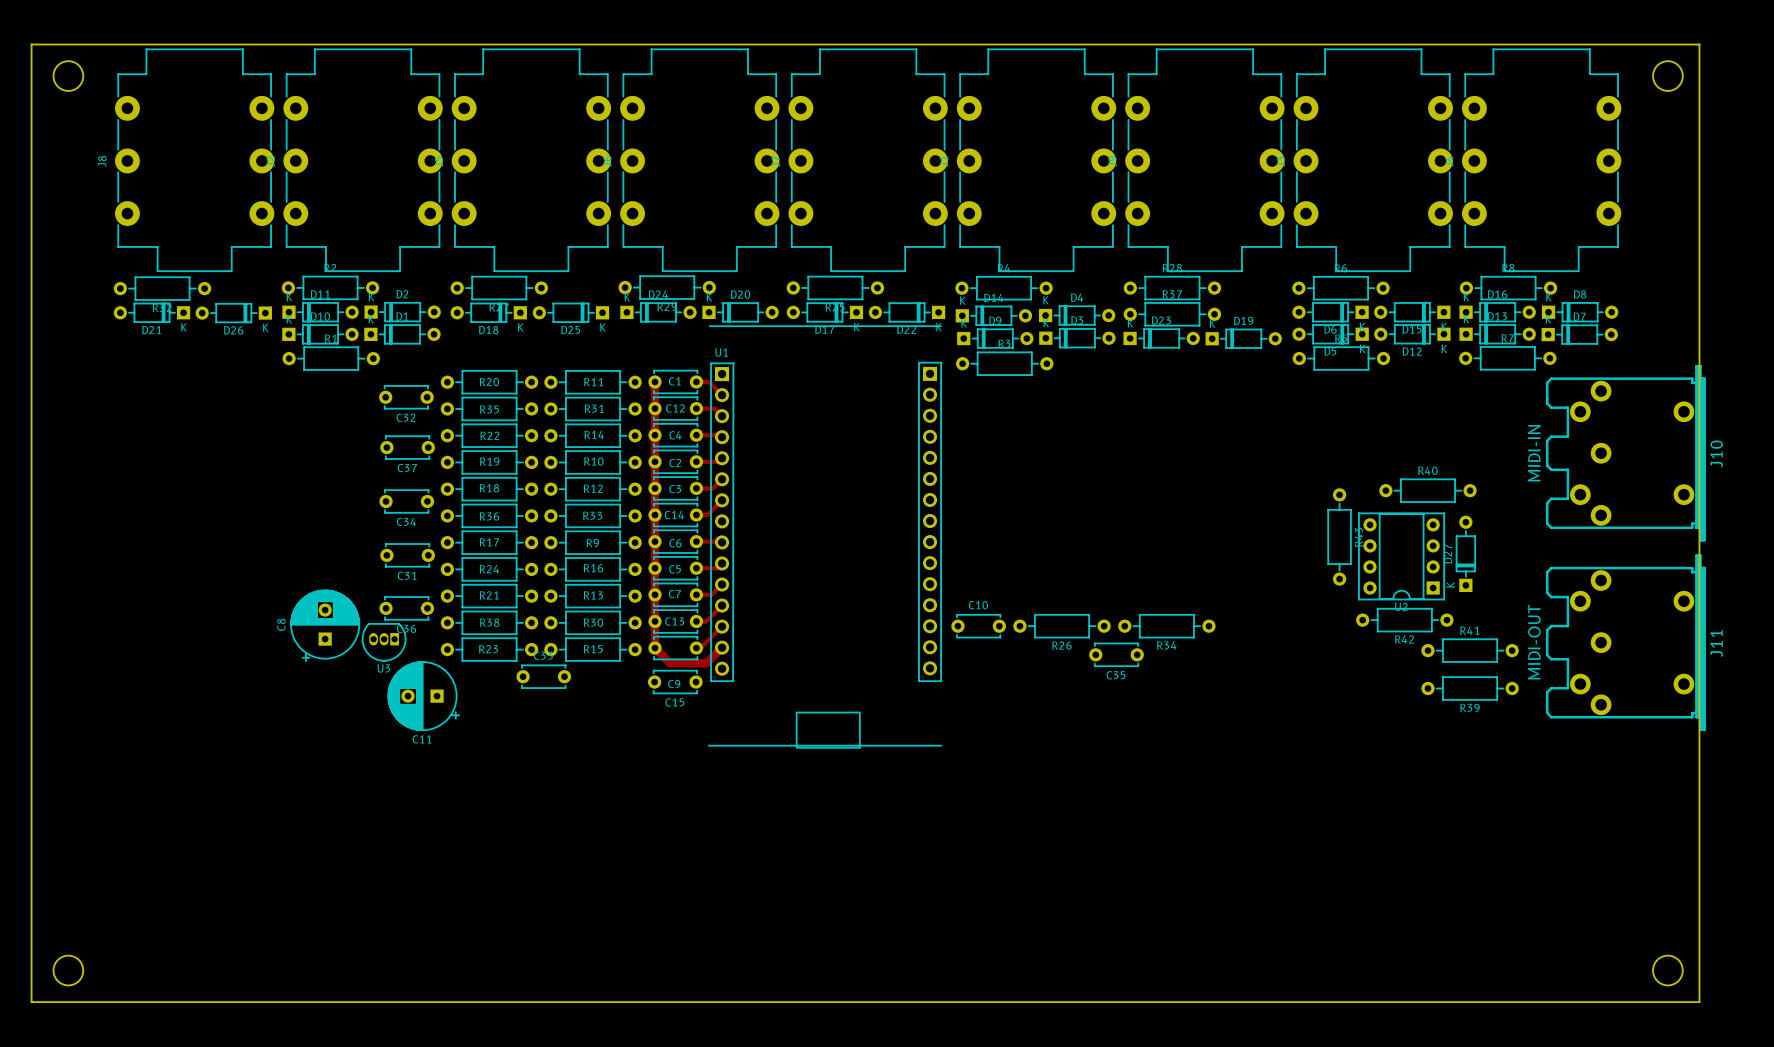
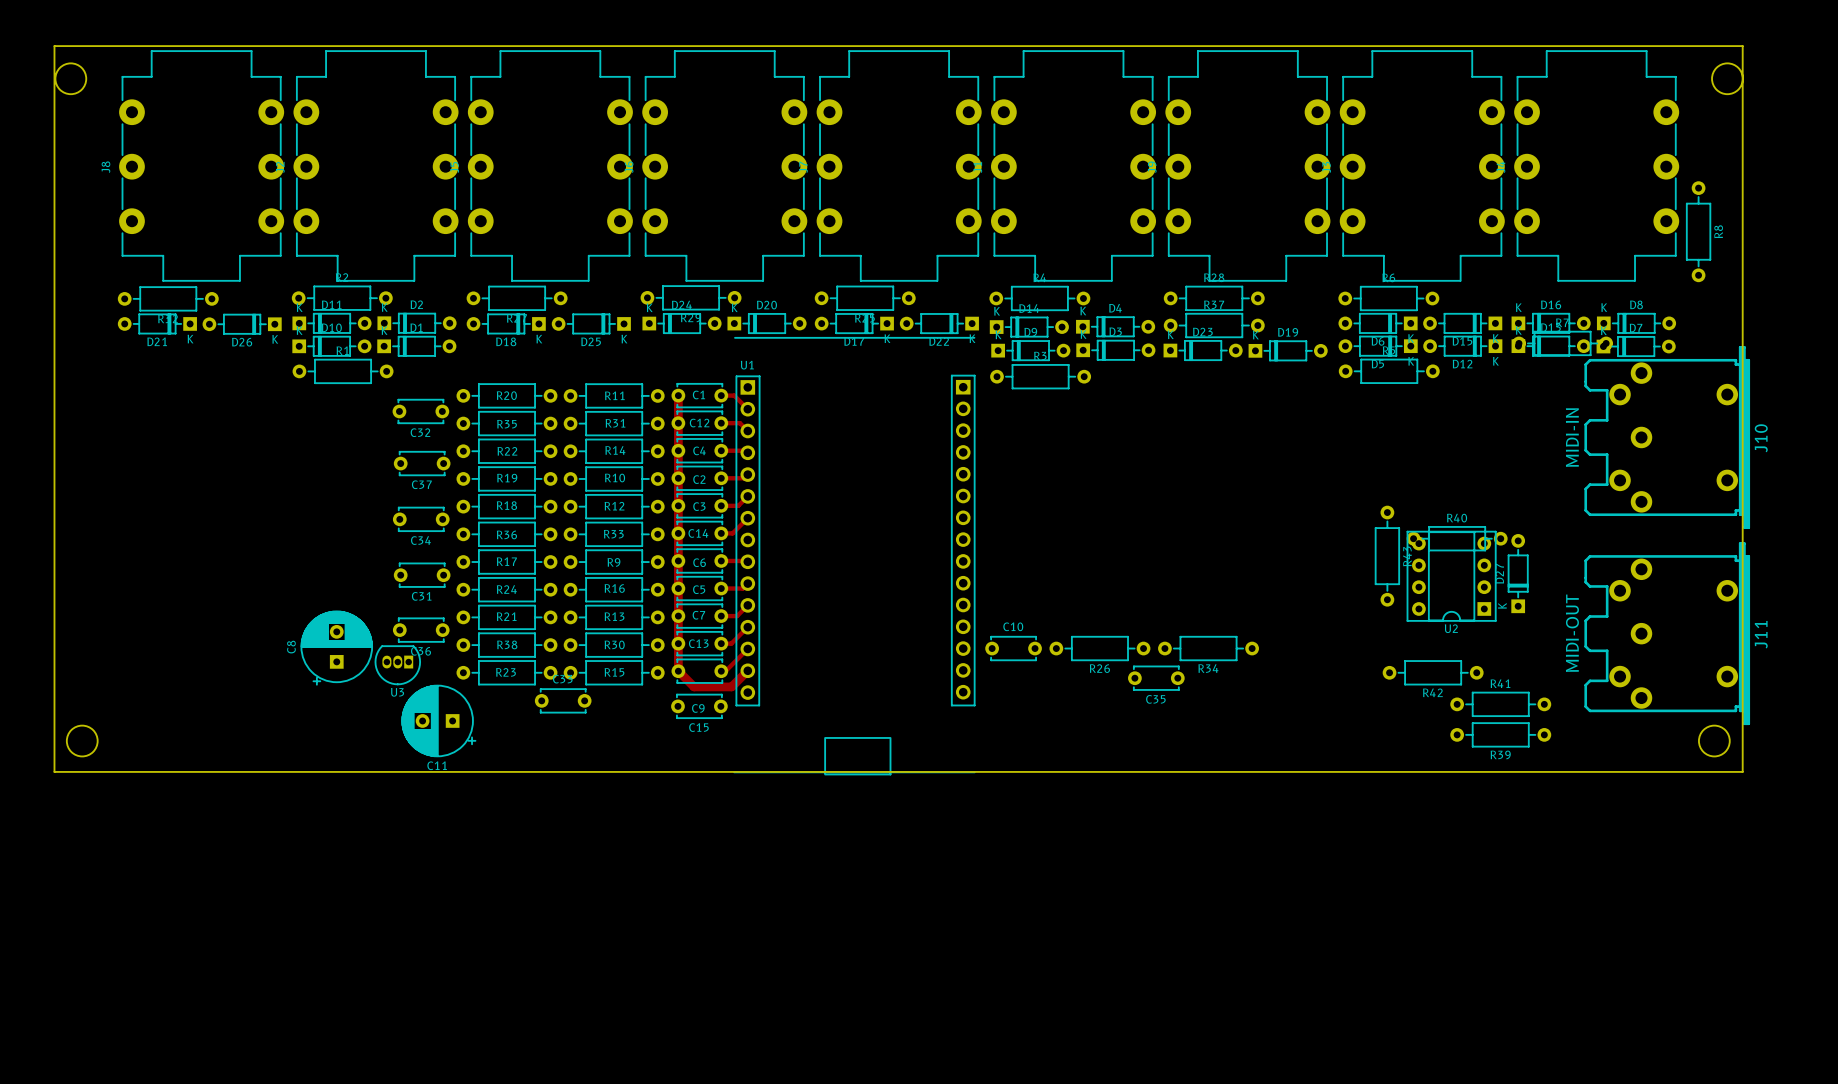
board edge: (52, 44) (31, 44) (31, 1002) (1699, 1002) (1699, 44) (1682, 44) -> (54, 46) (54, 771) (1742, 771) (1742, 46)
R8 rotation: 0° (1508, 288) -> 90° clockwise (1698, 231)
R8 position: (1508, 288) -> (1698, 231)
R7 position: (1507, 358) -> (1562, 343)
J10 position: (1625, 453) -> (1667, 437)
R40 position: (1427, 490) -> (1457, 538)
R42 position: (1404, 620) -> (1433, 672)
J11 position: (1625, 642) -> (1667, 633)
R41 position: (1470, 650) -> (1500, 704)
R39 position: (1470, 688) -> (1500, 734)
round board edge: none -> [66, 725, 99, 757]
round board edge: none -> [1698, 725, 1731, 757]
round board edge: [53, 955, 84, 986] -> none
round board edge: [1652, 955, 1684, 986] -> none

